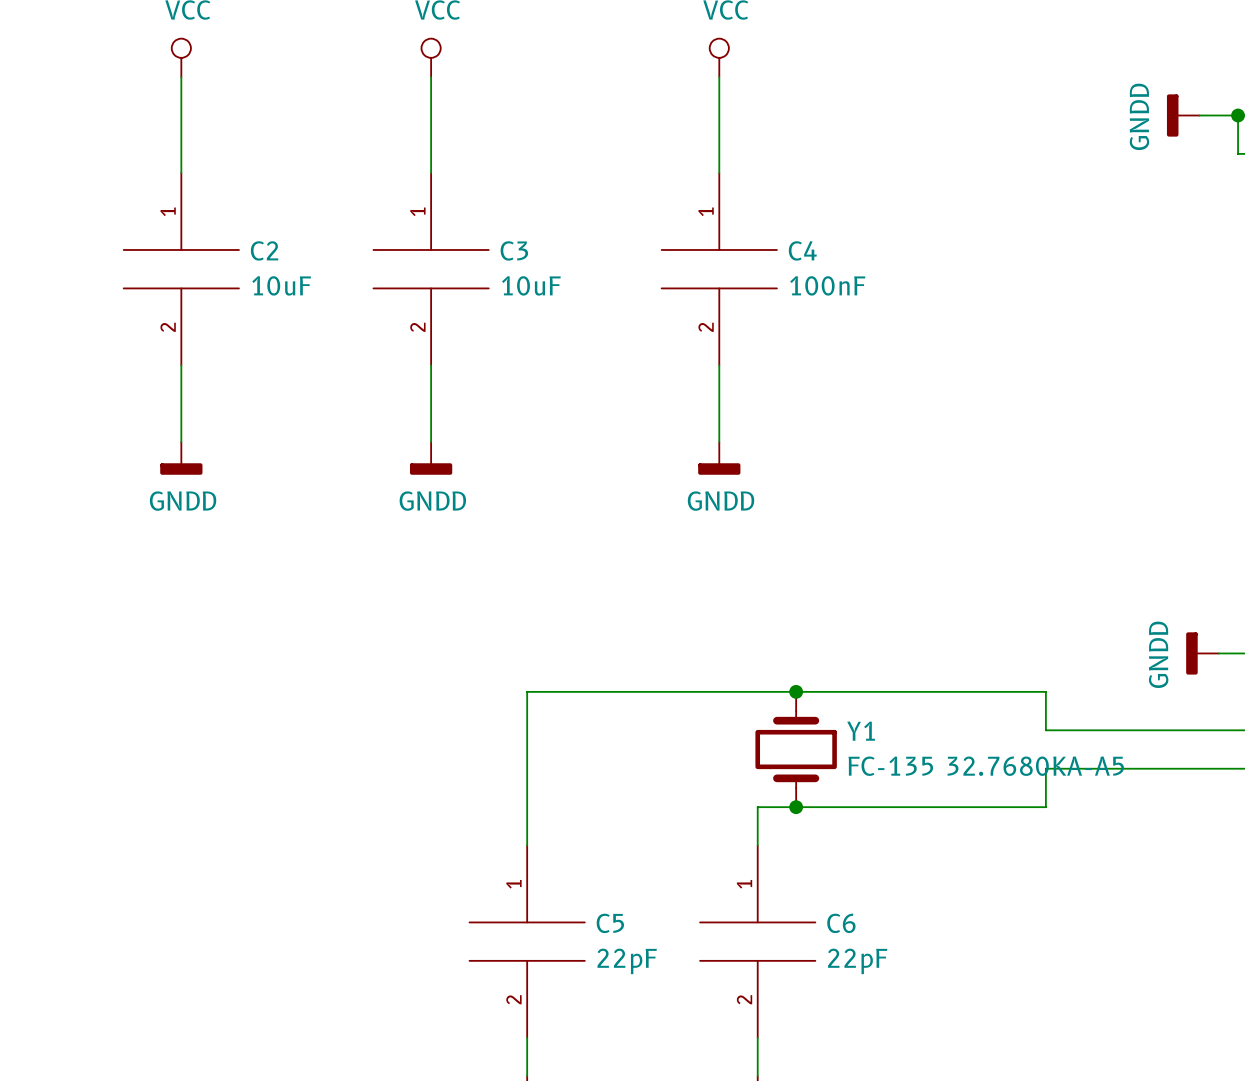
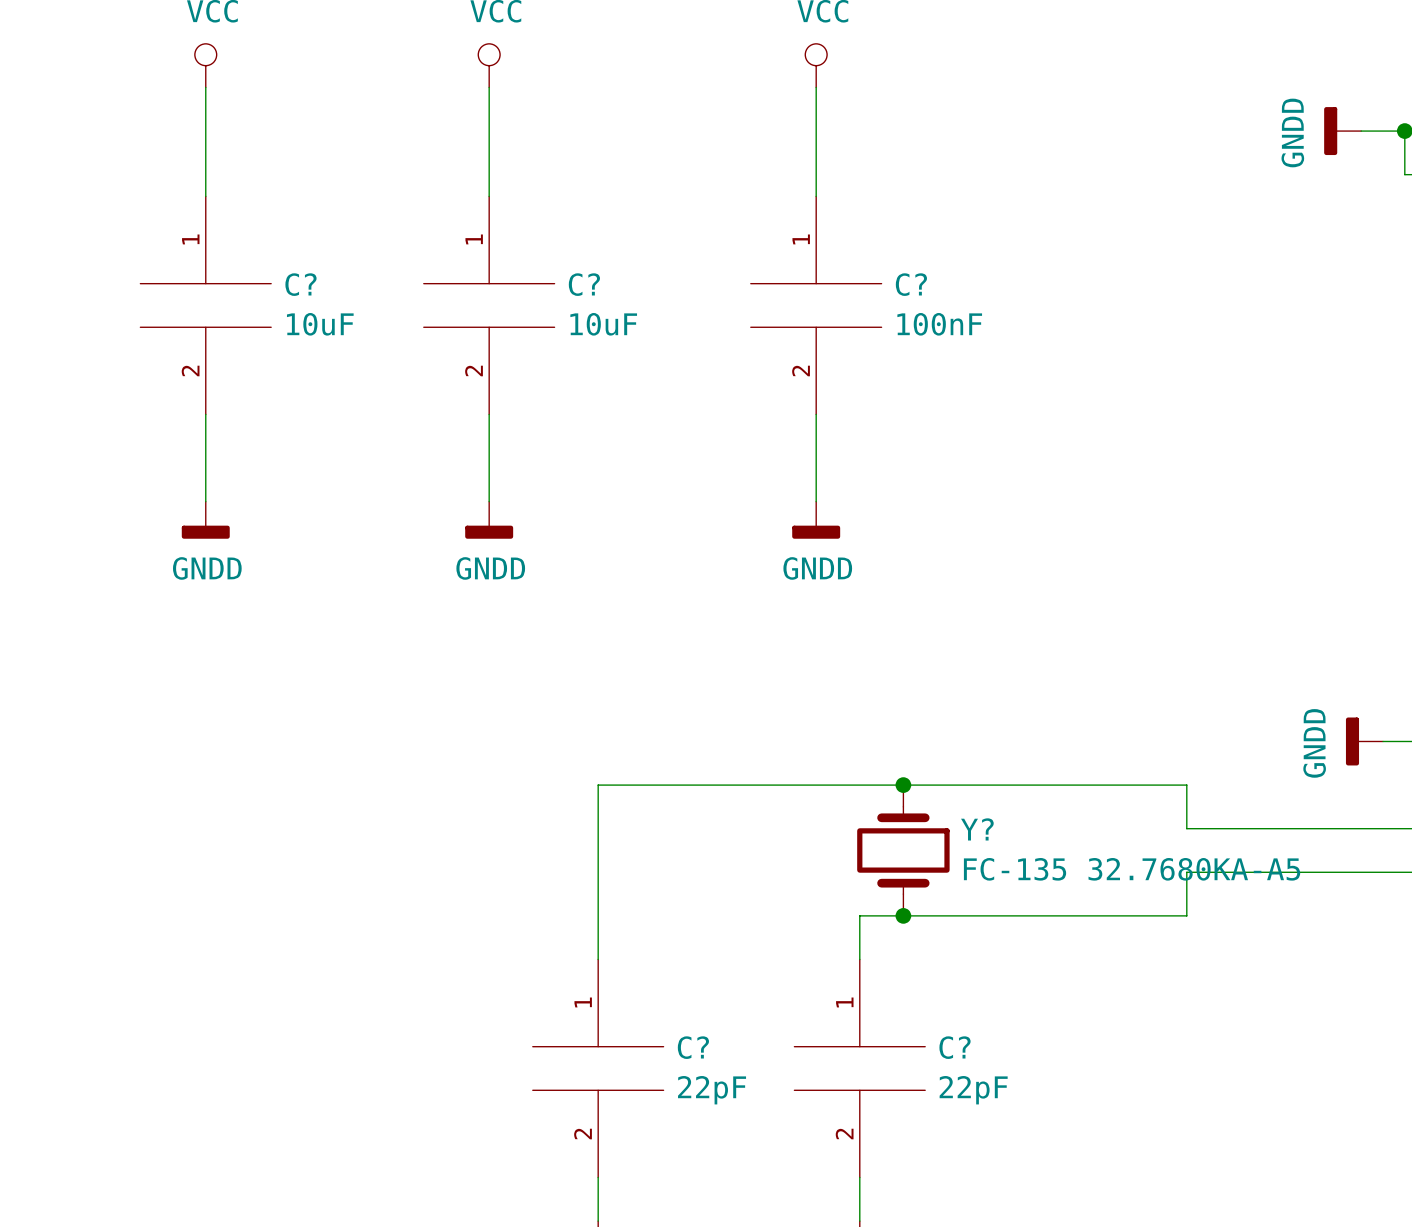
C2 name: C2 (264, 250) -> C? (300, 284)
C3 name: C3 (514, 250) -> C? (584, 284)
C4 name: C4 (802, 250) -> C? (911, 284)
Y1 name: Y1 (861, 731) -> Y? (977, 829)
C5 name: C5 (610, 923) -> C? (693, 1047)
C6 name: C6 (841, 923) -> C? (955, 1047)

